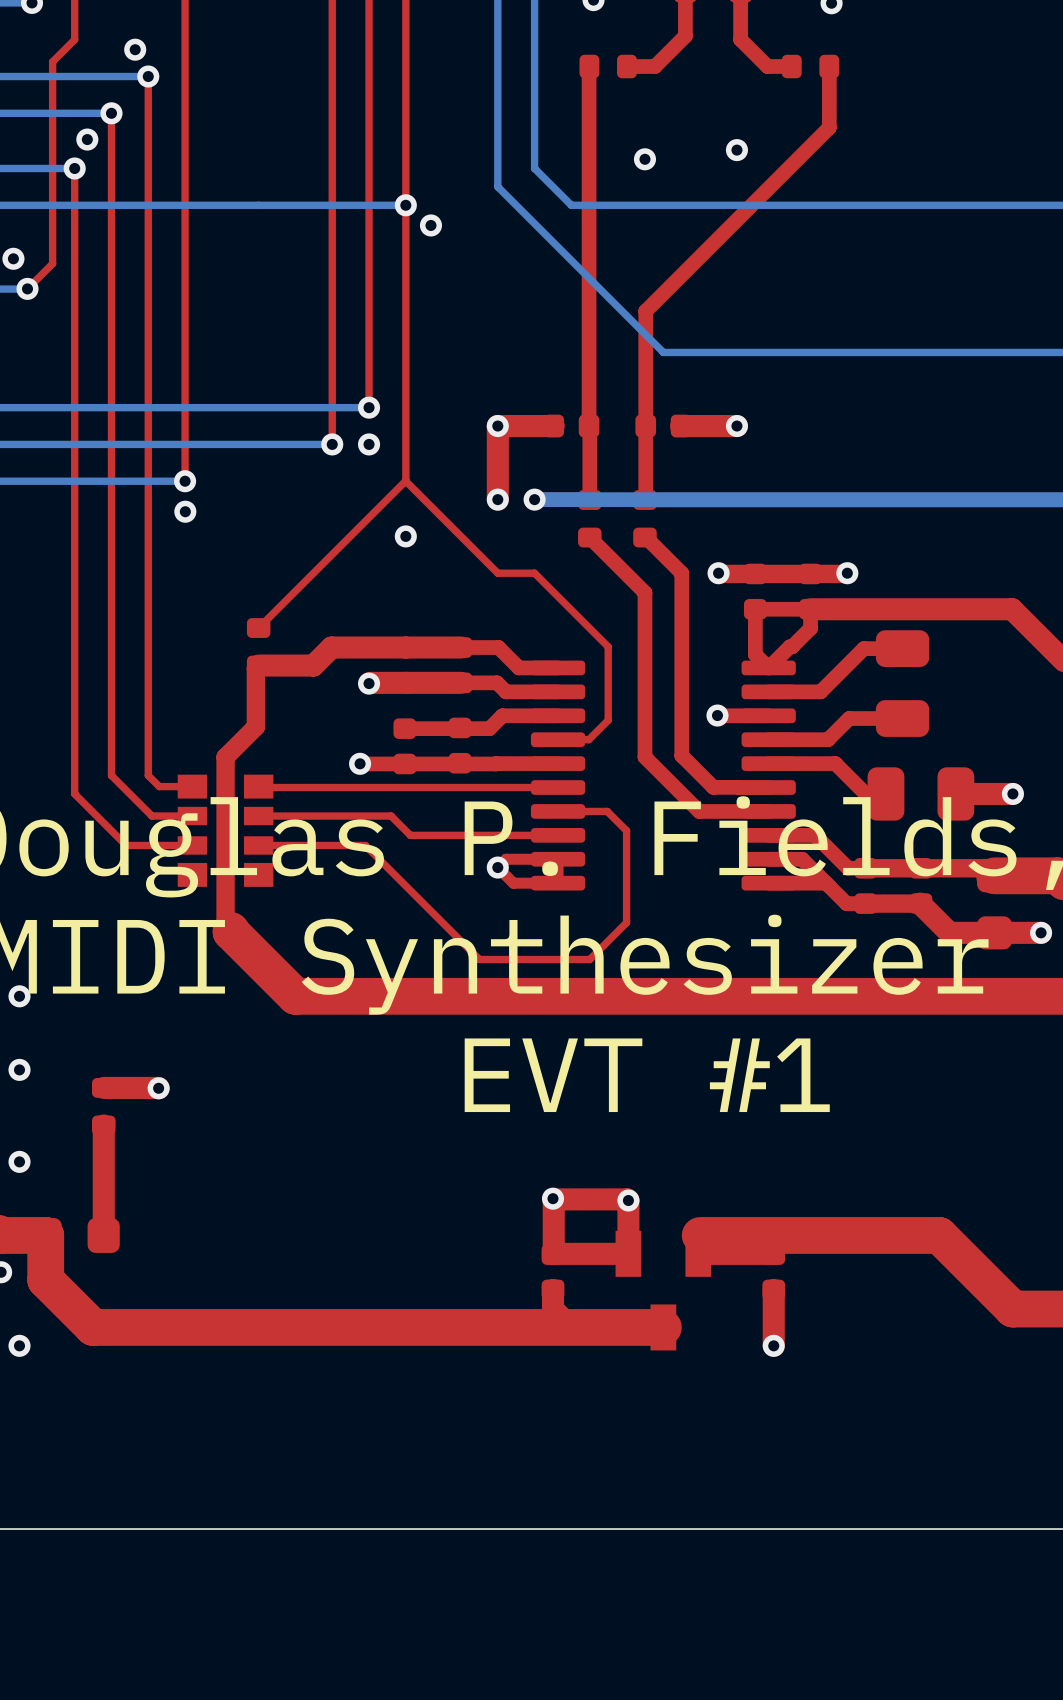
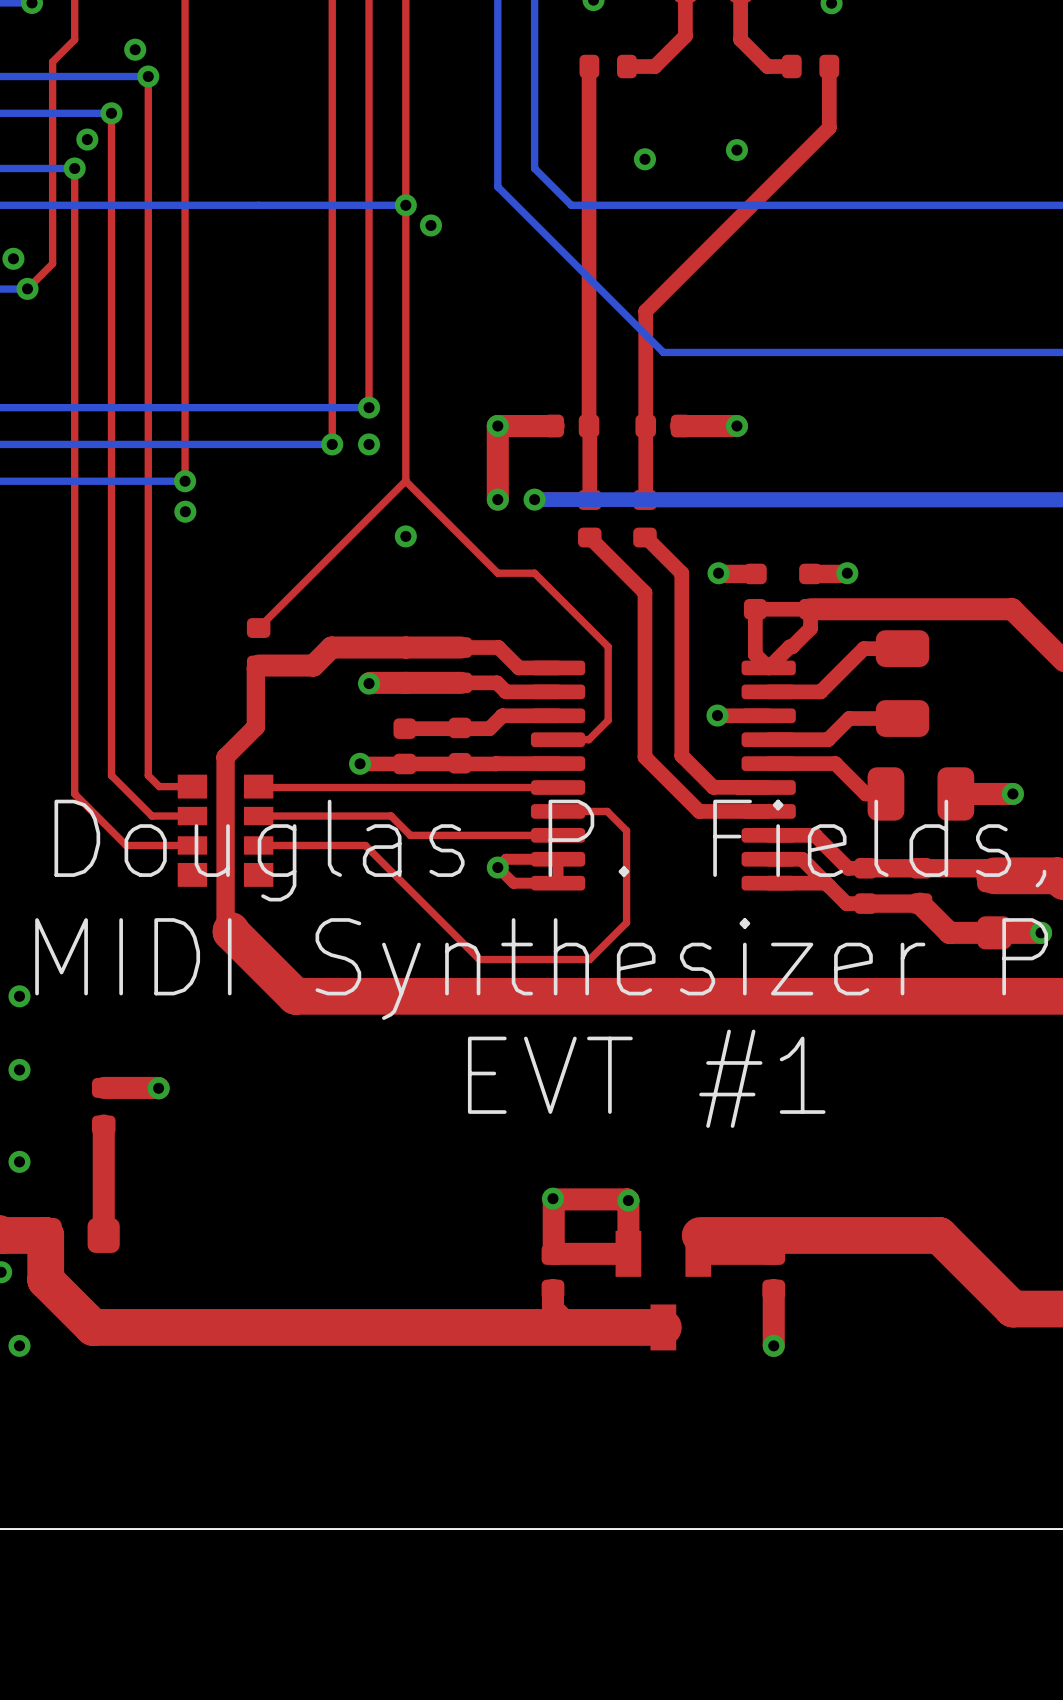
top track: (810, 573) (755, 573) -> none

